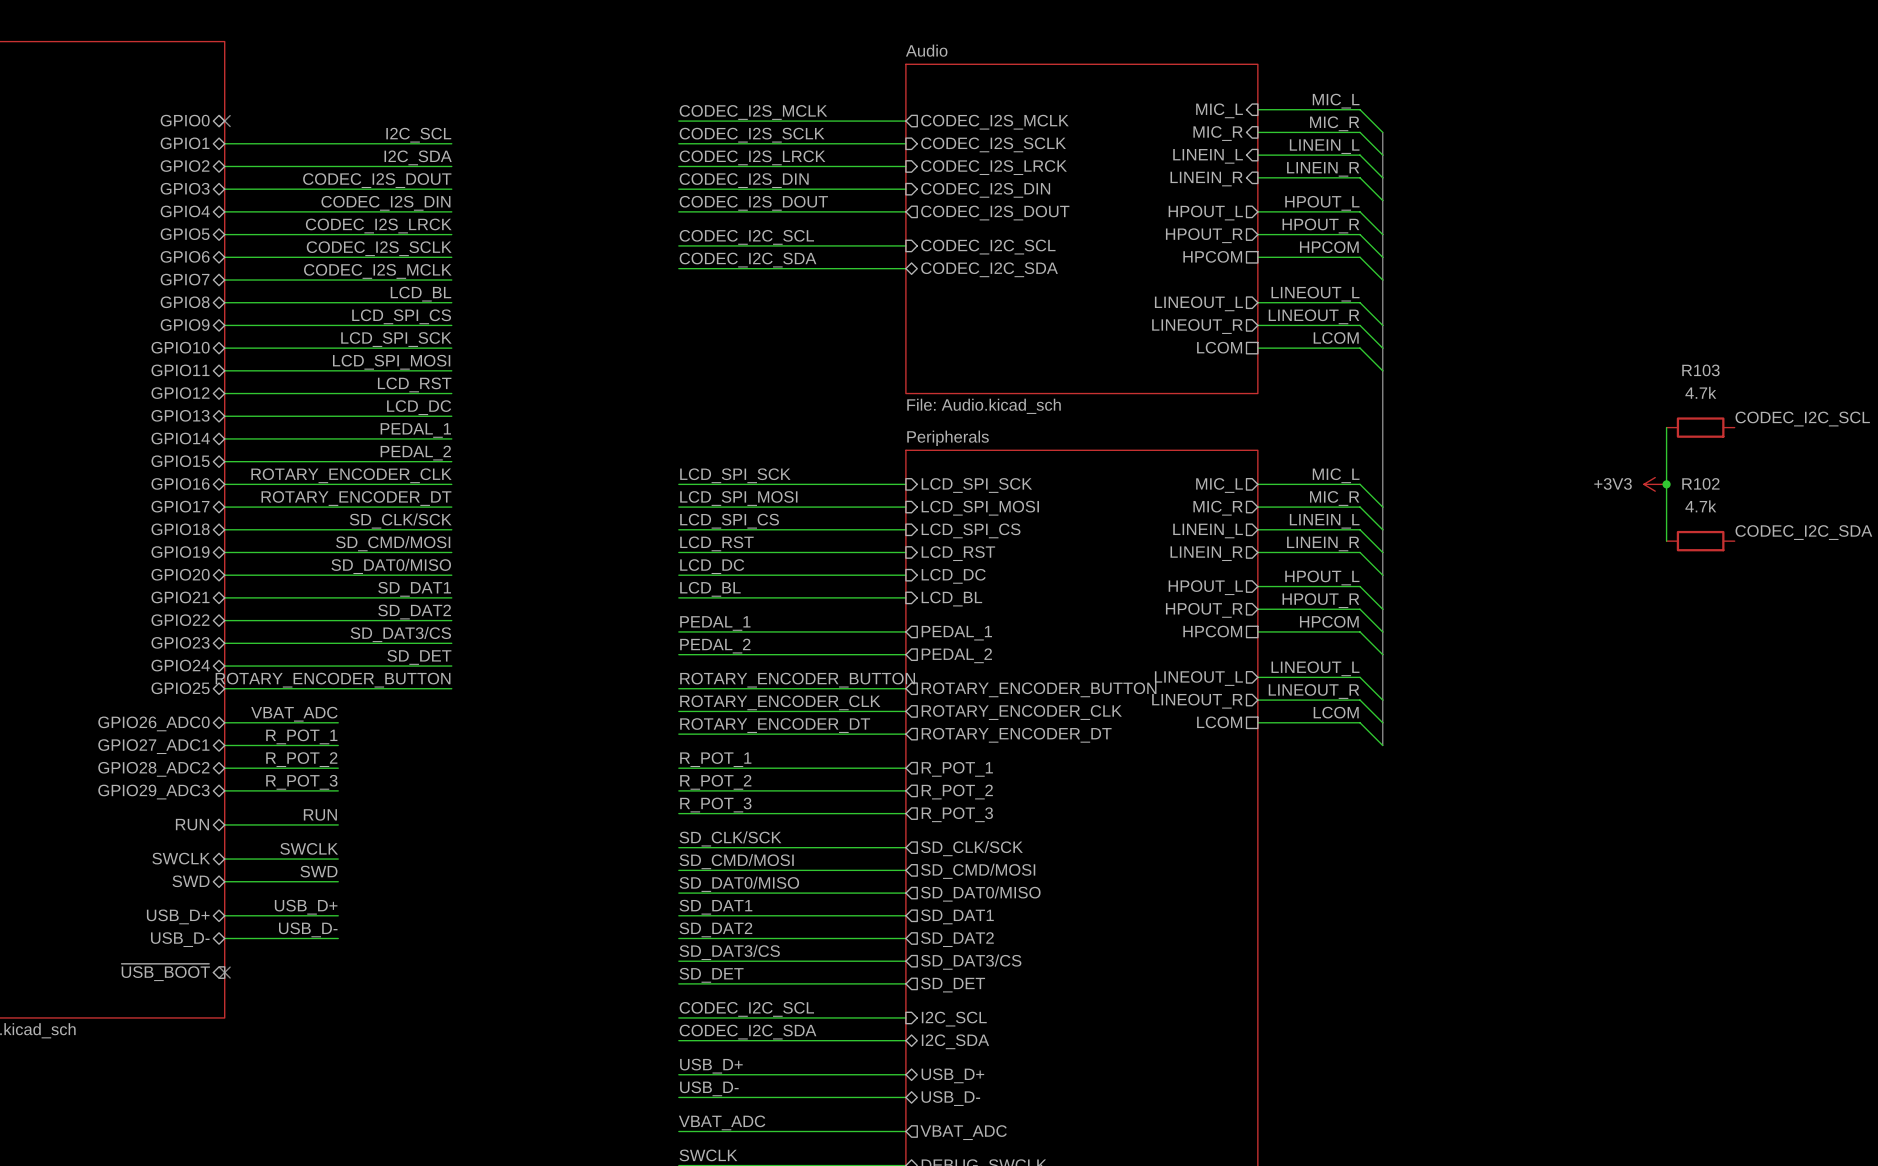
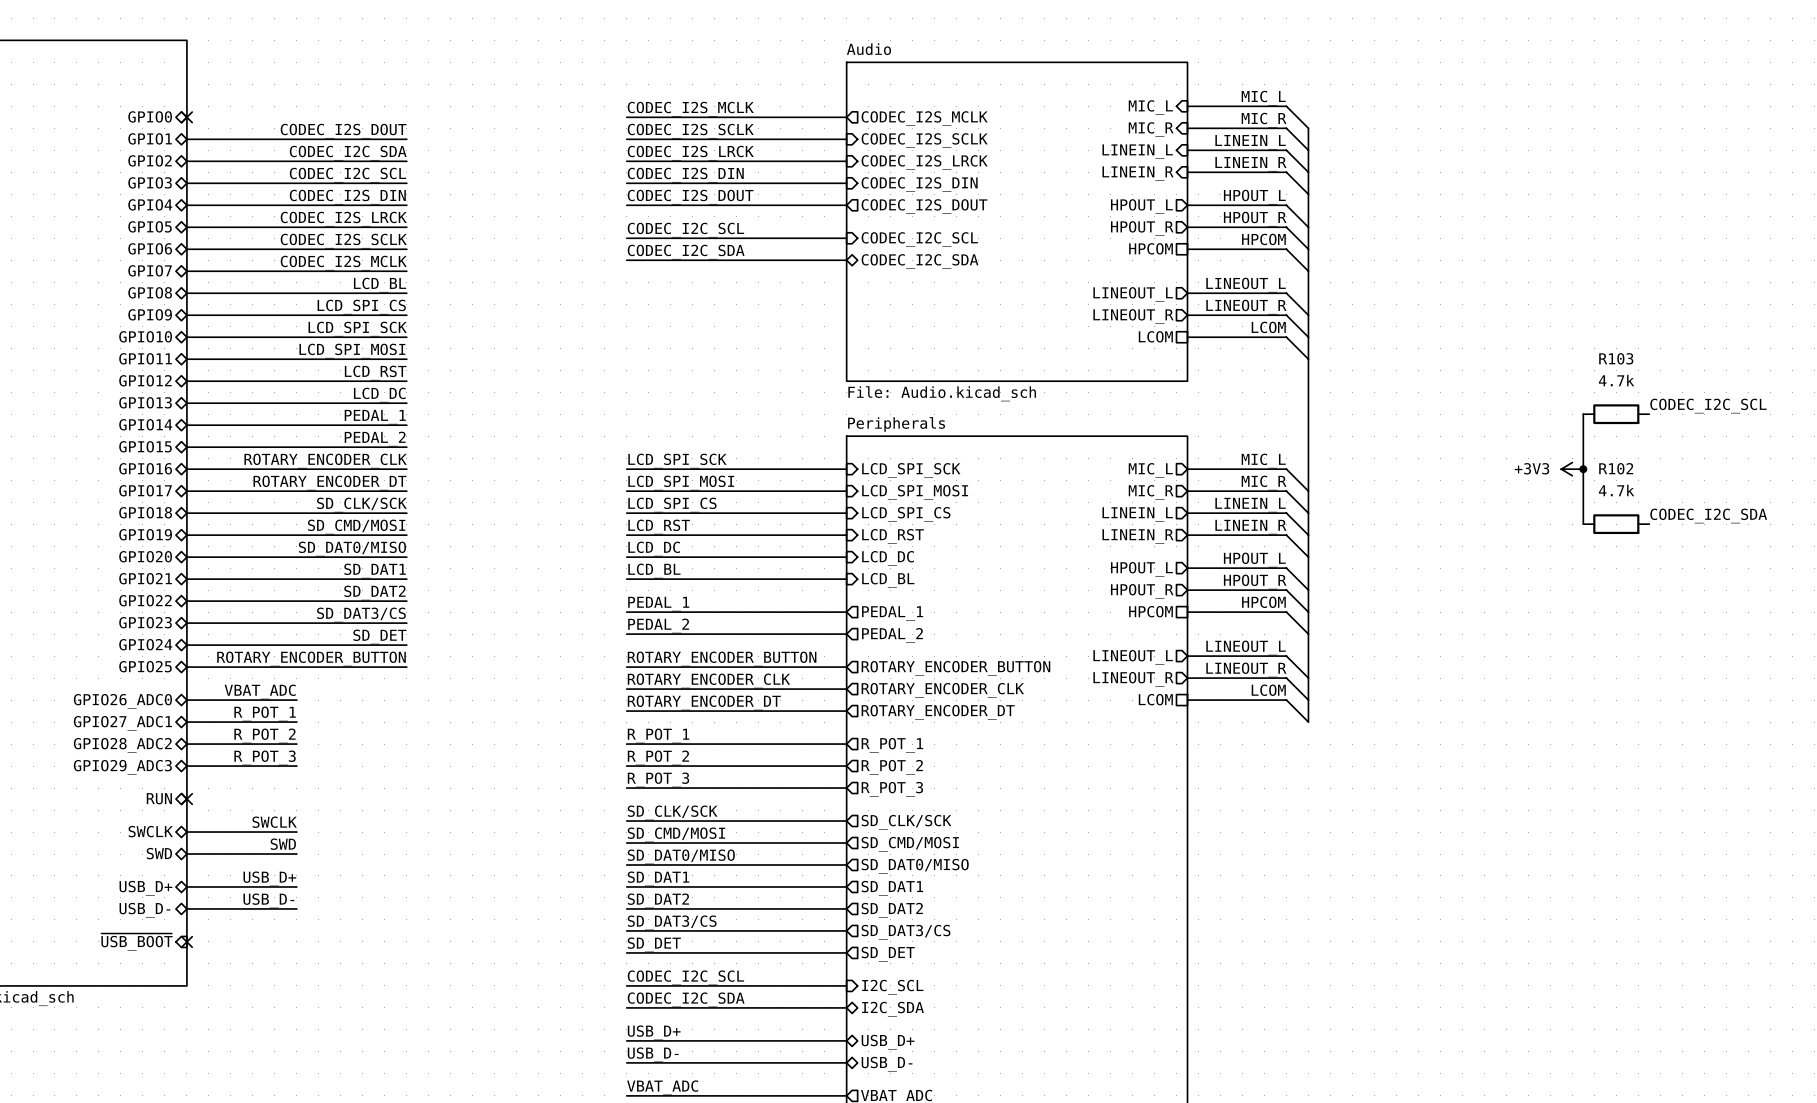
label: I2C_SCL (418, 135) -> CODEC_I2S_DOUT (343, 131)
label: I2C_SDA (418, 157) -> CODEC_I2C_SDA (348, 153)
label: CODEC_I2S_DOUT (377, 180) -> CODEC_I2C_SCL (347, 175)
label: RUN (320, 814) -> none
wire: (224, 824) (338, 824) -> none
no-connect mark: none -> (186, 799)

